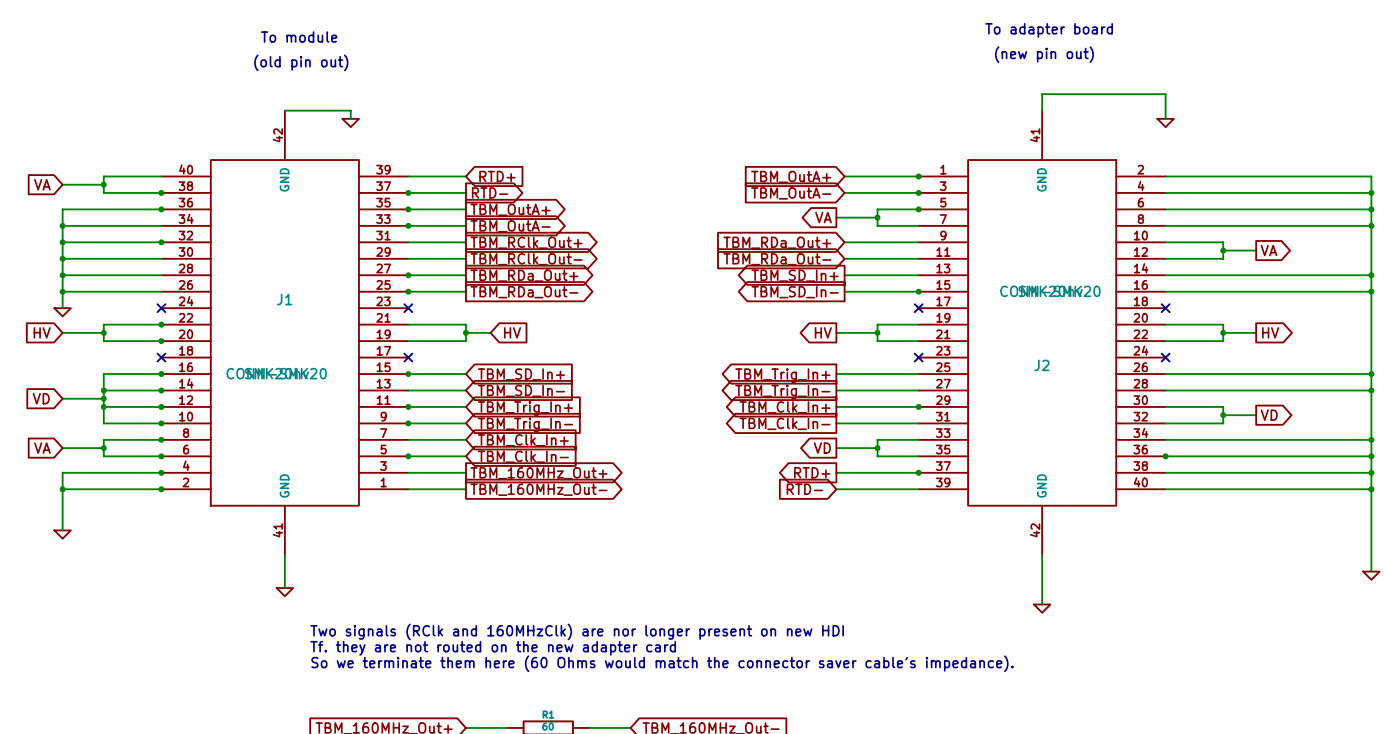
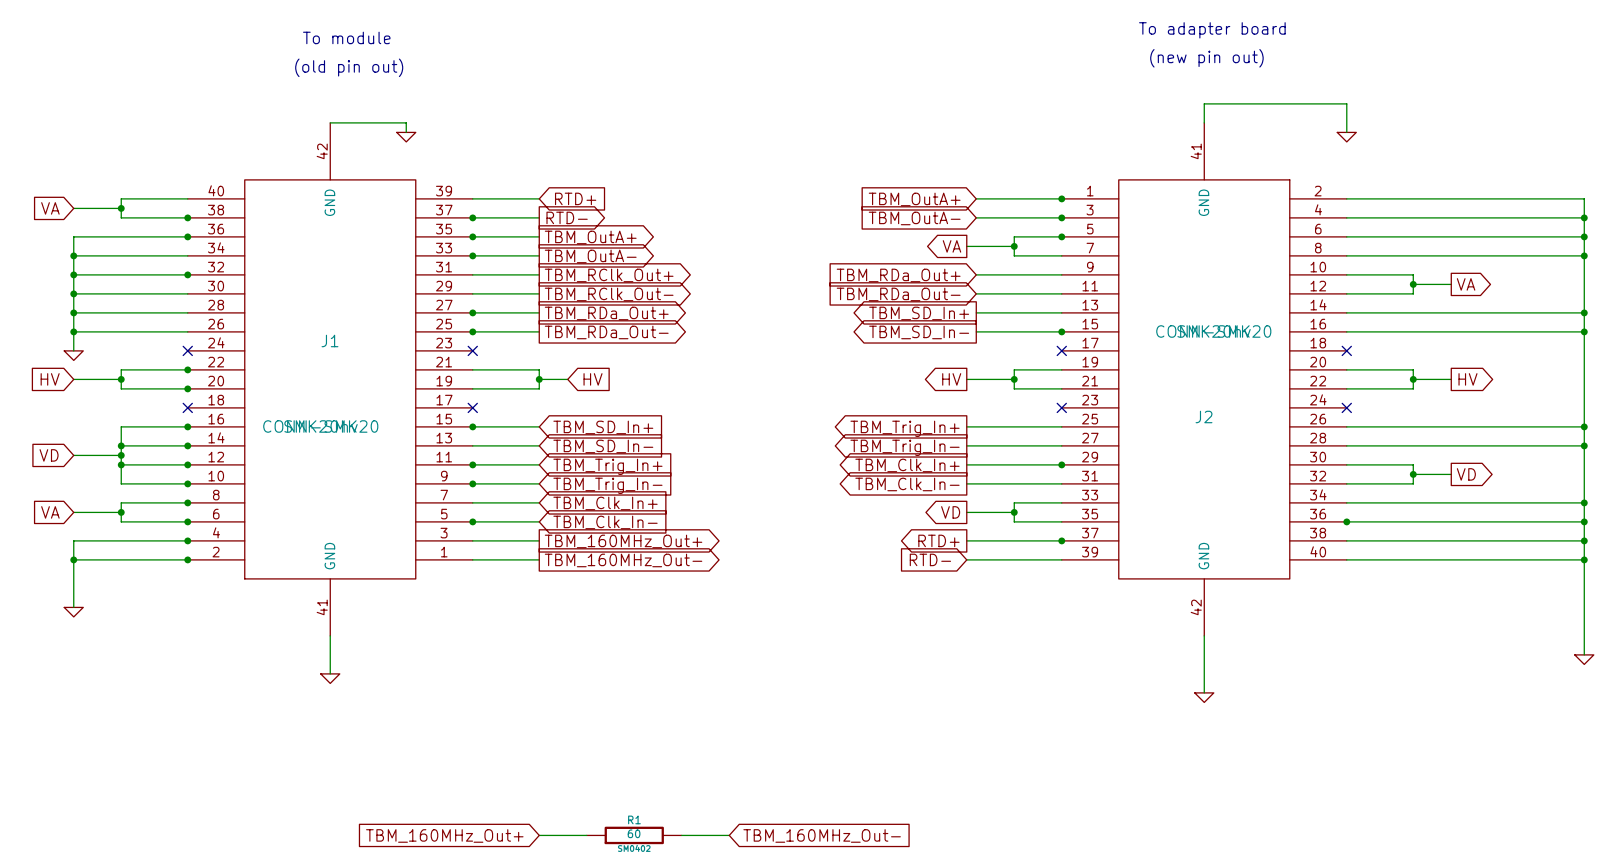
text: Two signals (RClk and 160MHzClk) are nor longer present on new HDI (577, 631) -> none
text: Tf. they are not routed on the new adapter card (493, 648) -> none
text: So we terminate them here (60 Ohms would match the connector saver cable's impedance). (662, 663) -> none

